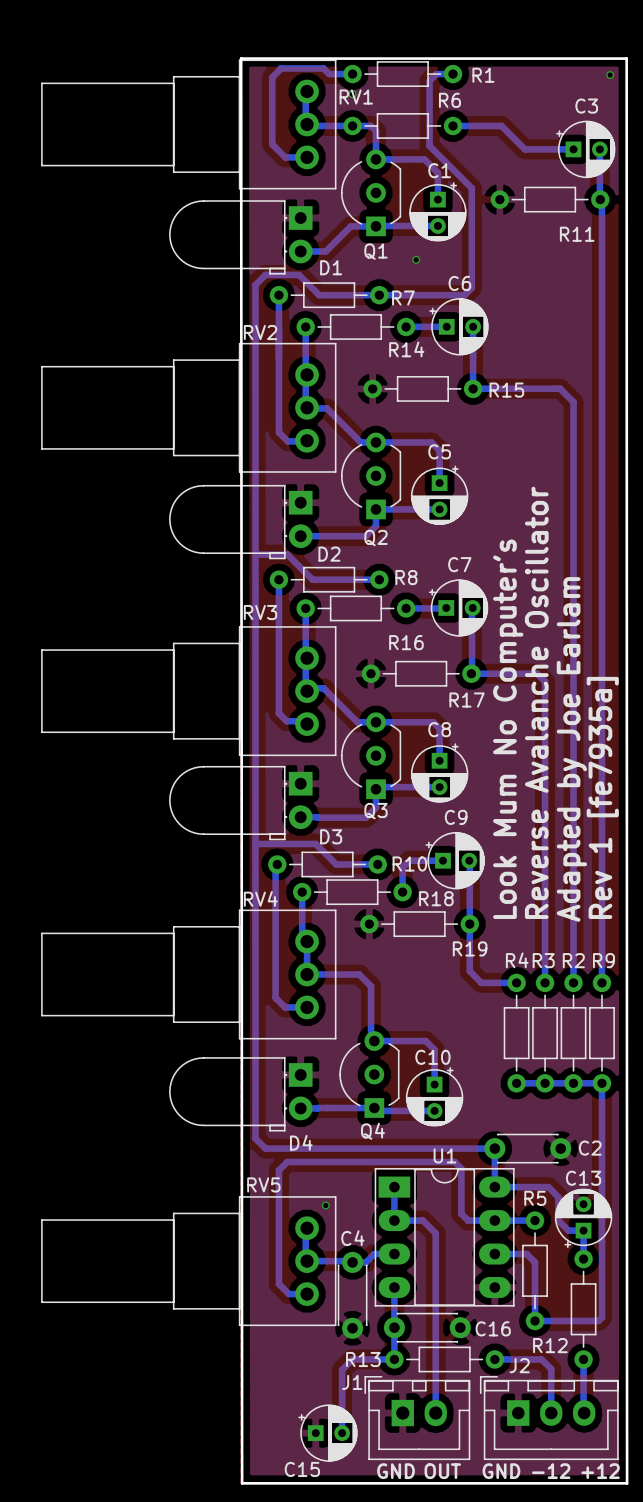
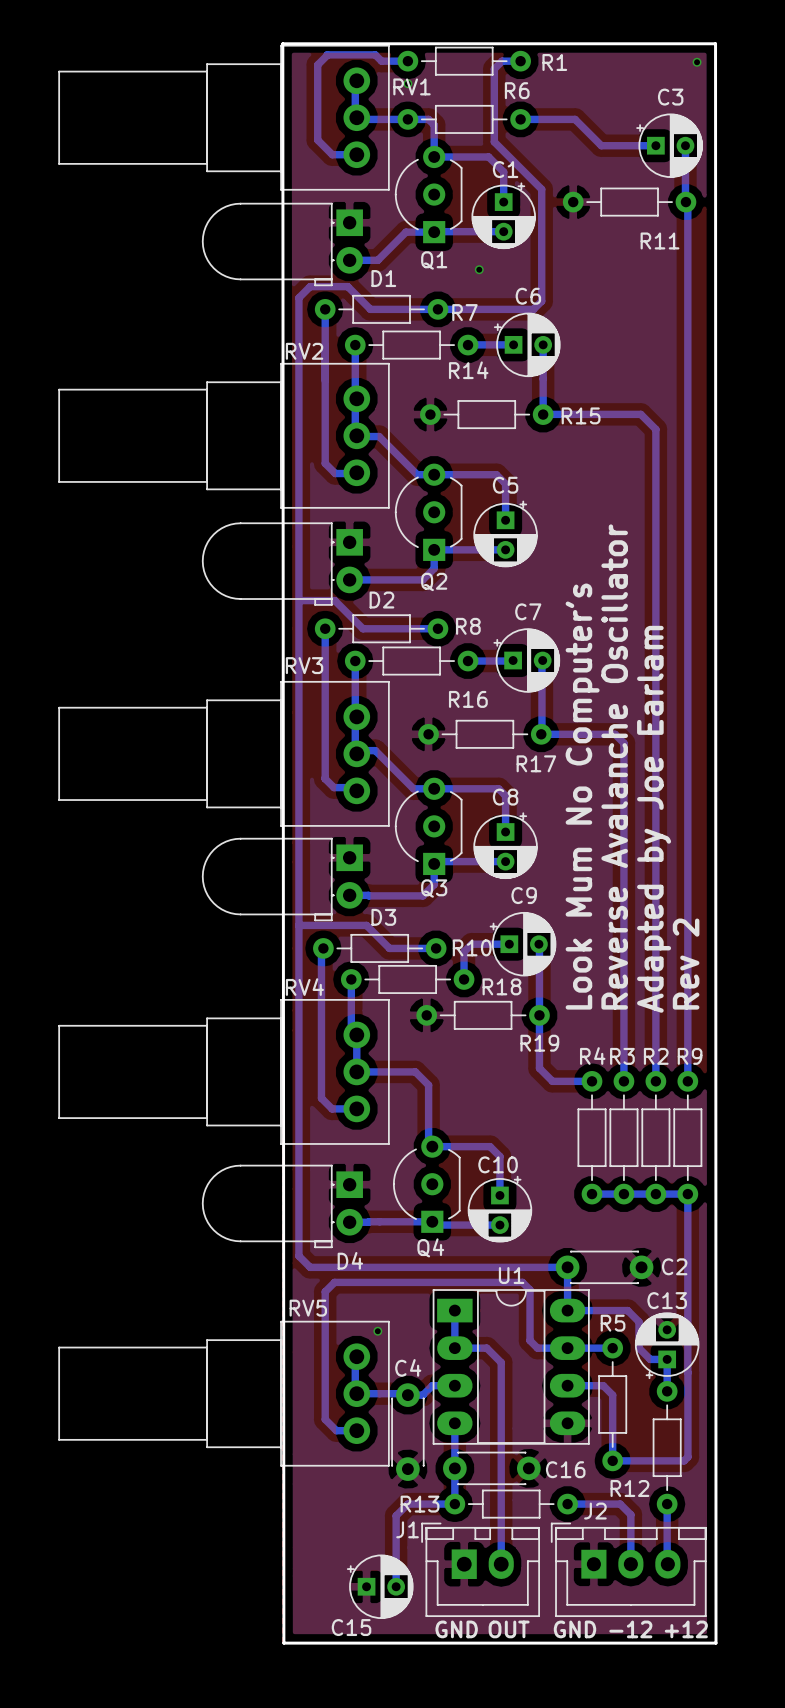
text: Rev 1 [fe7935a] (602, 797) -> Rev 2 (686, 964)

